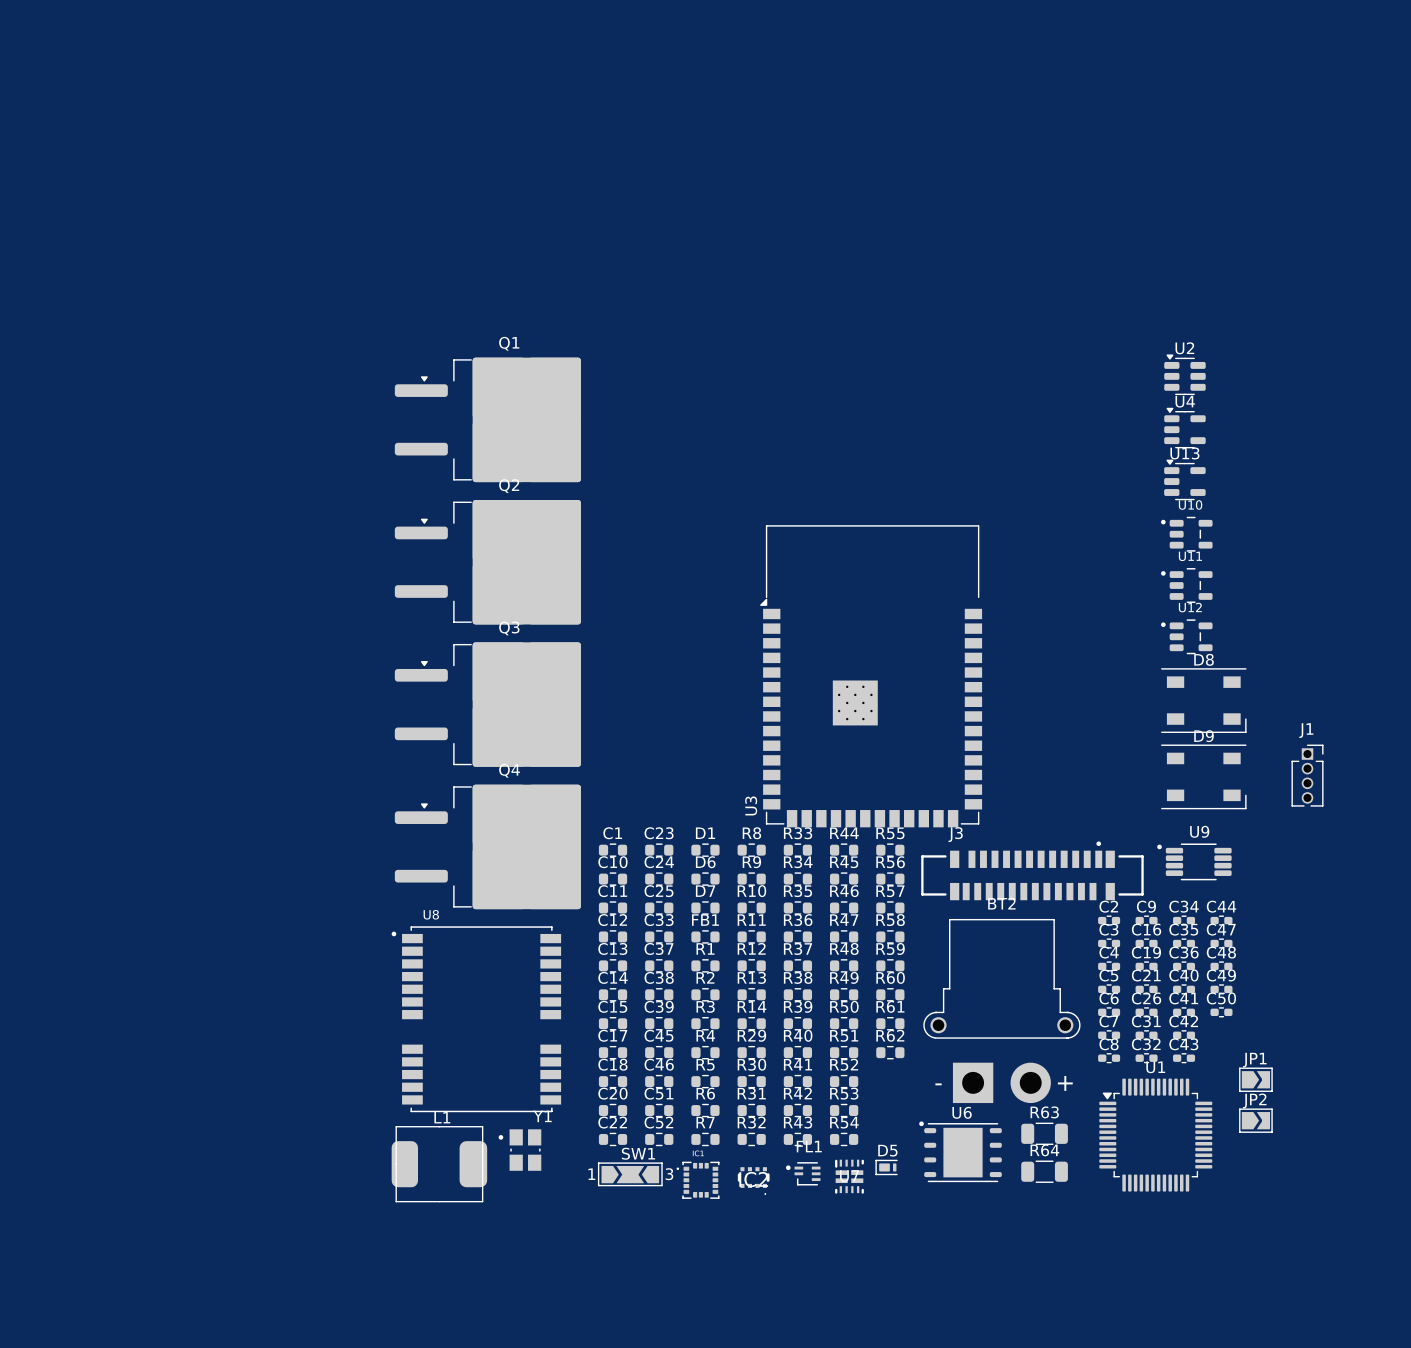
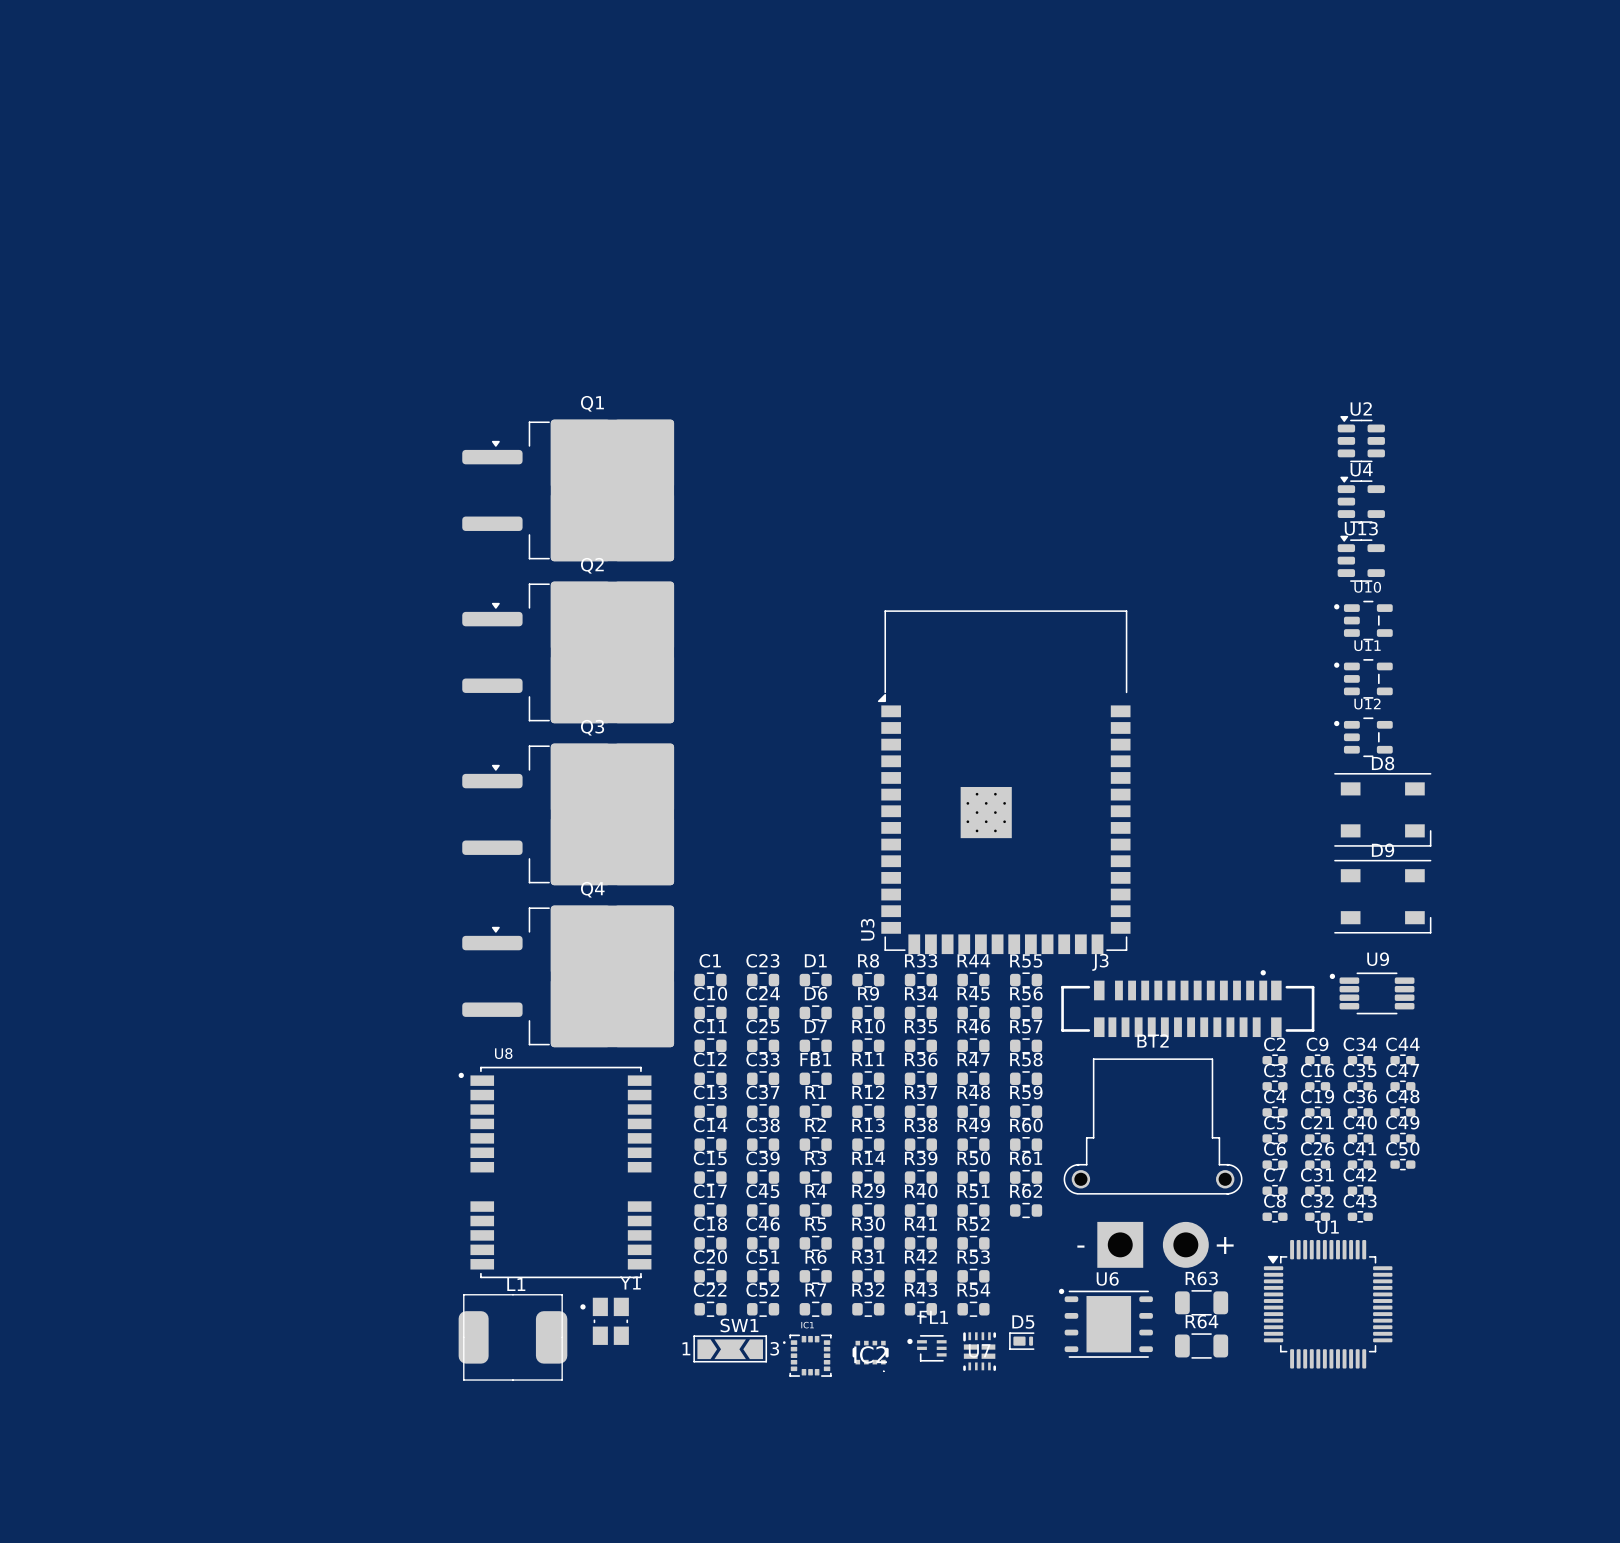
J1: (1307, 775) -> none
JP1: (1255, 1079) -> none
JP2: (1255, 1120) -> none

